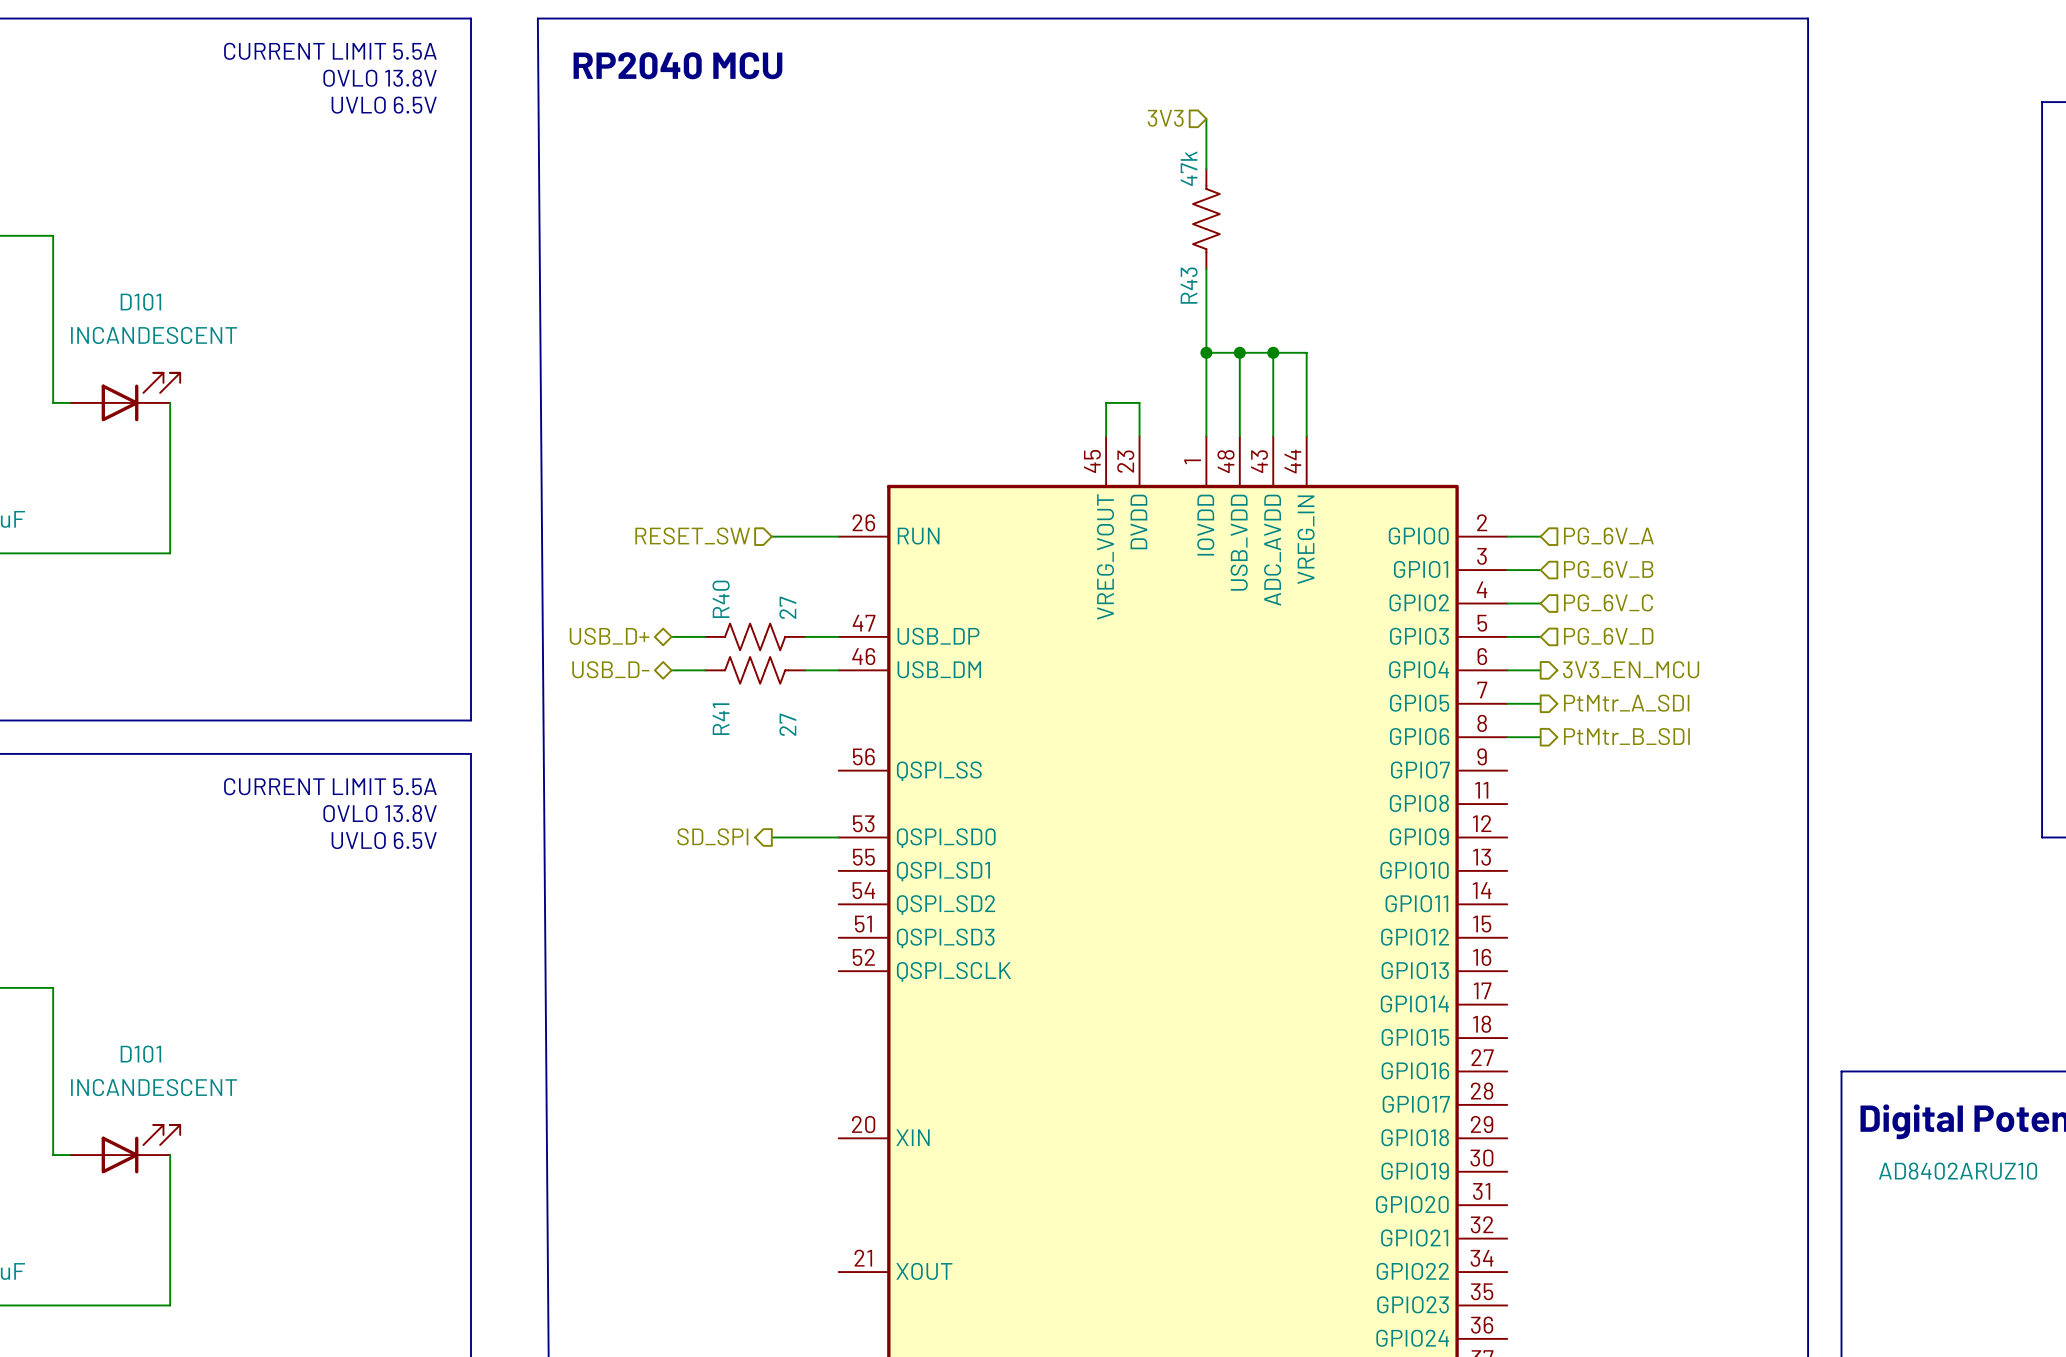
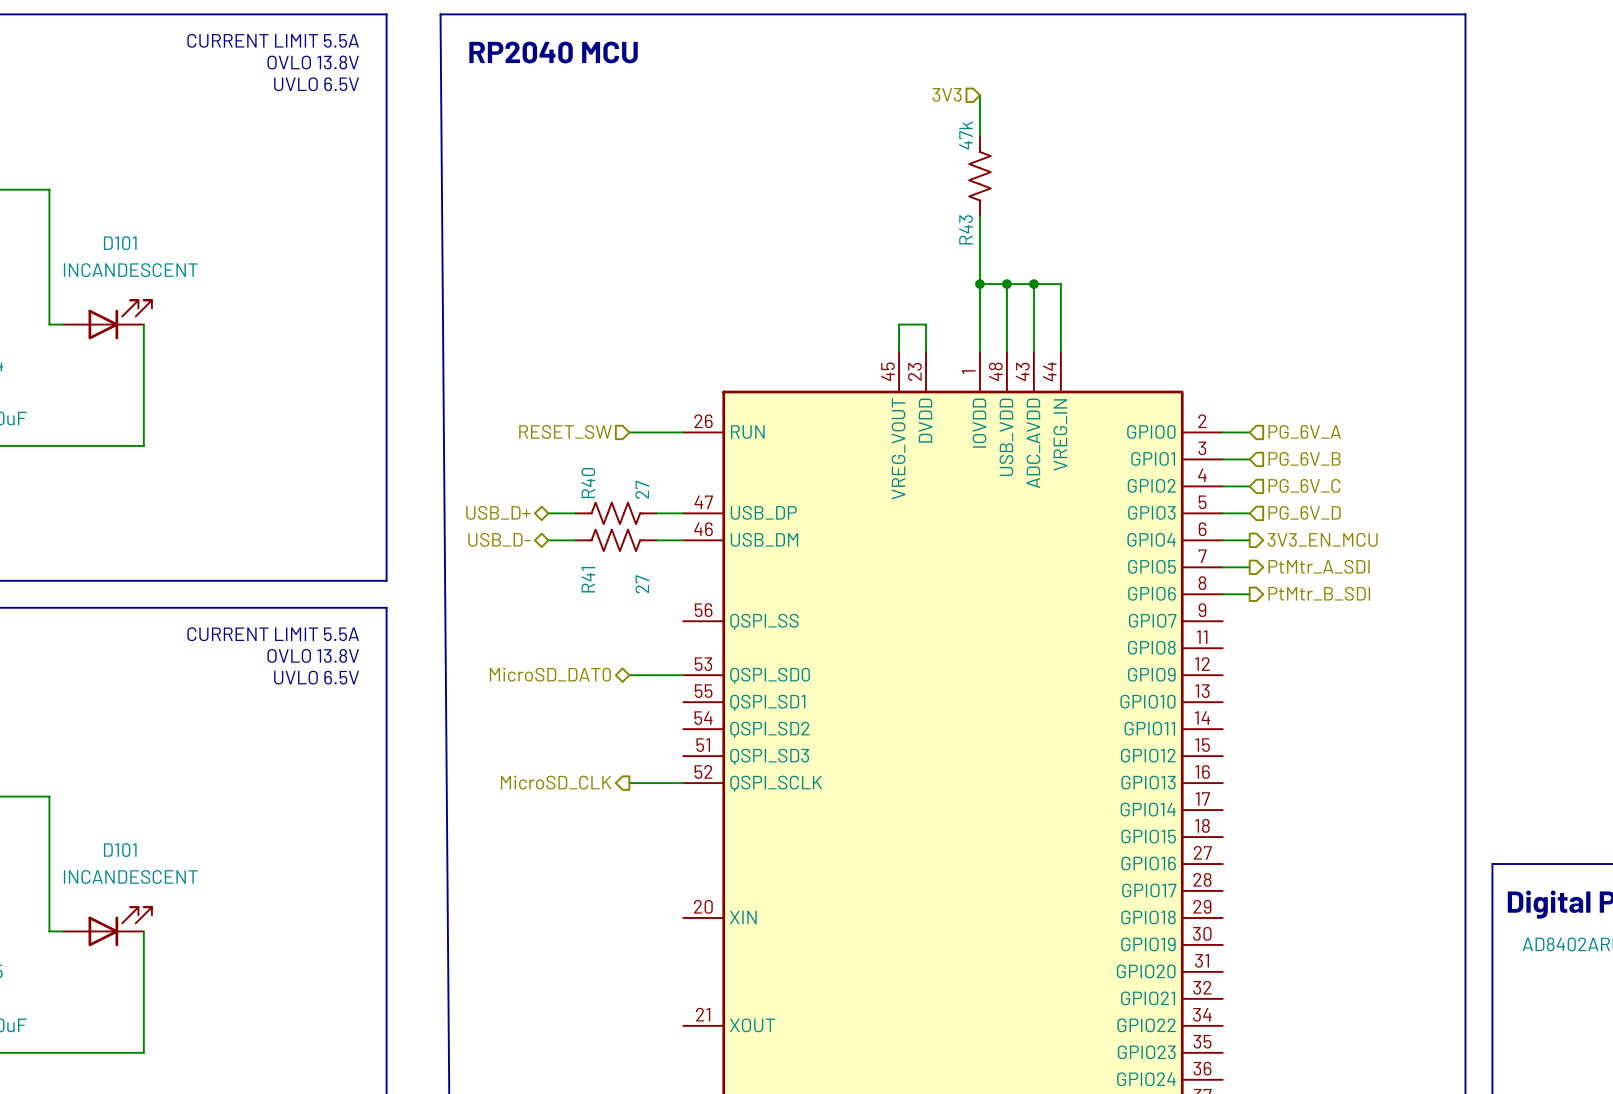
hierarchical label shape: output (712, 836) -> bidirectional (550, 674)
hierarchical label: SD_SPI (712, 836) -> MicroSD_DAT0 (550, 674)
hierarchical label: none -> MicroSD_CLK (556, 782)
wire: none -> (629, 783) (683, 783)

